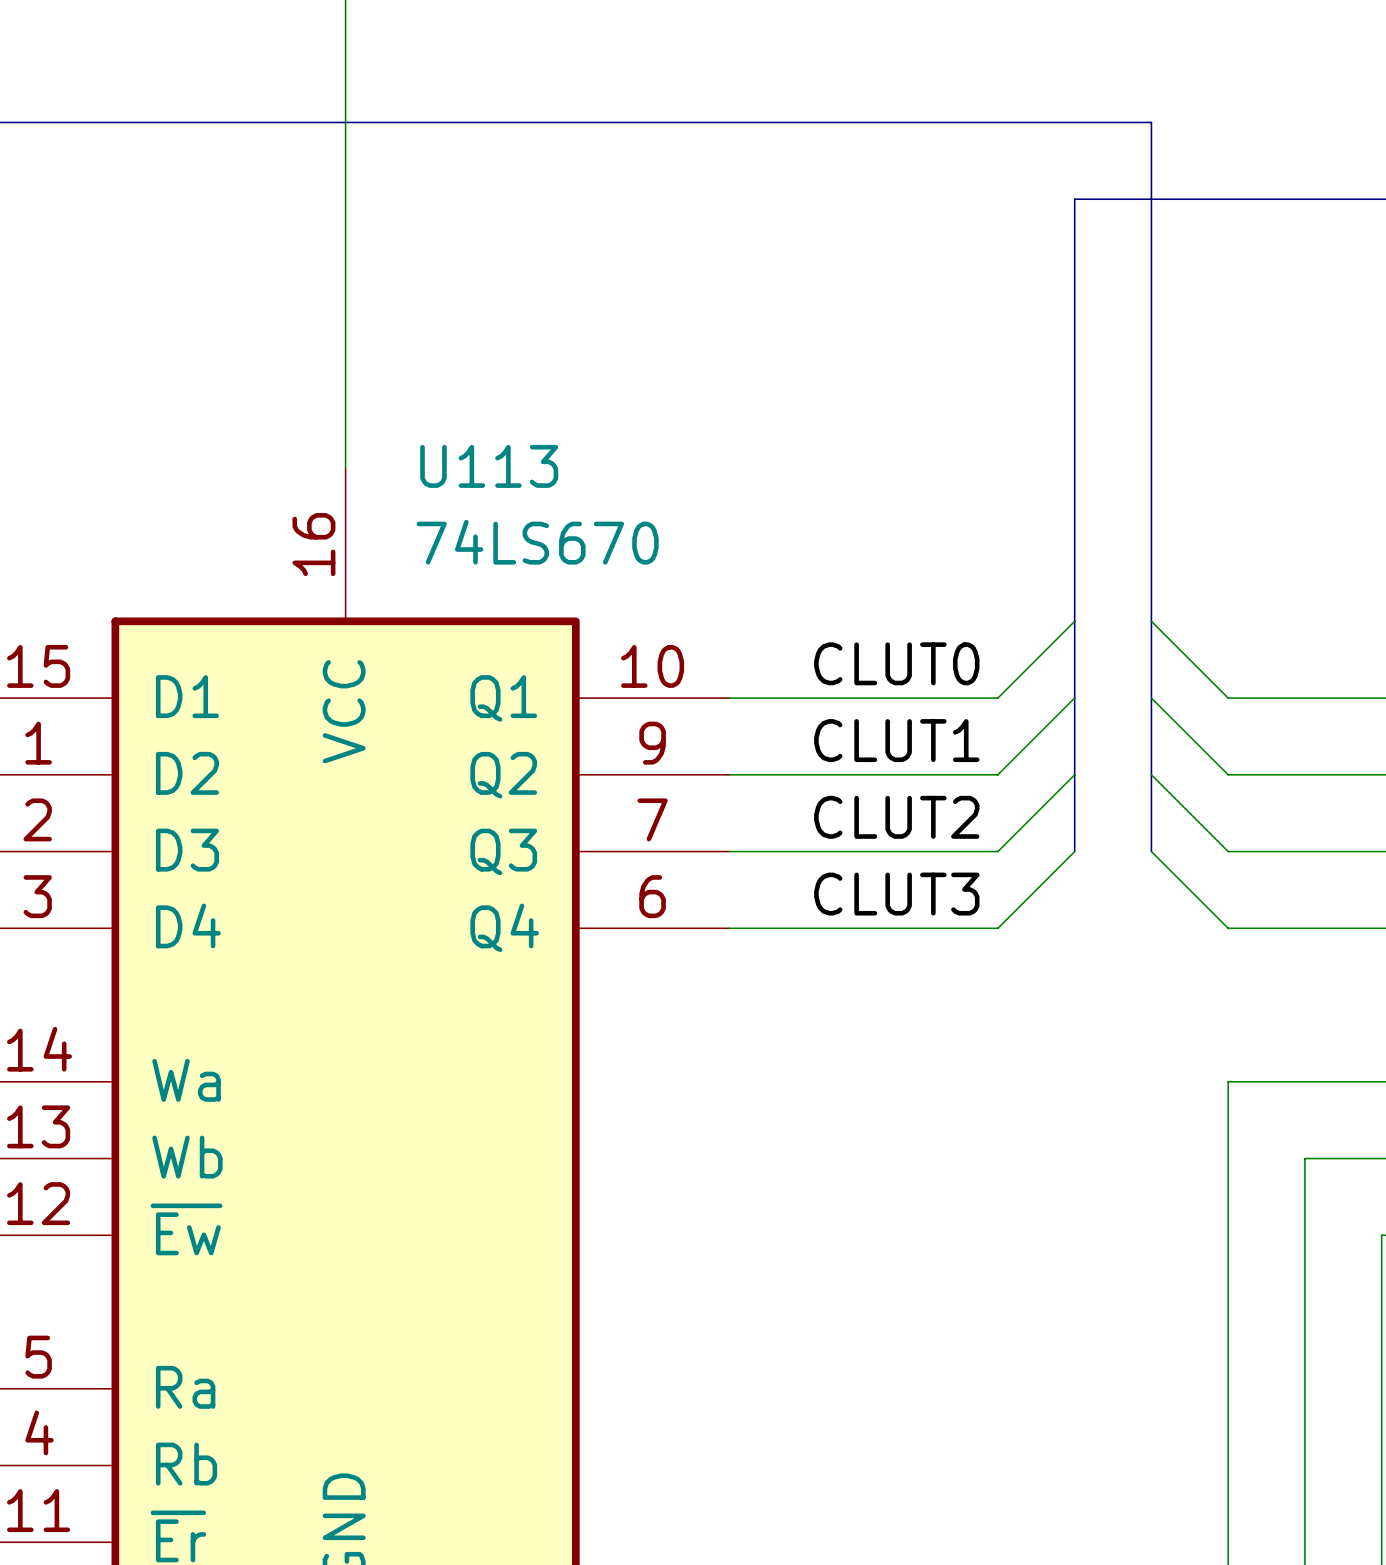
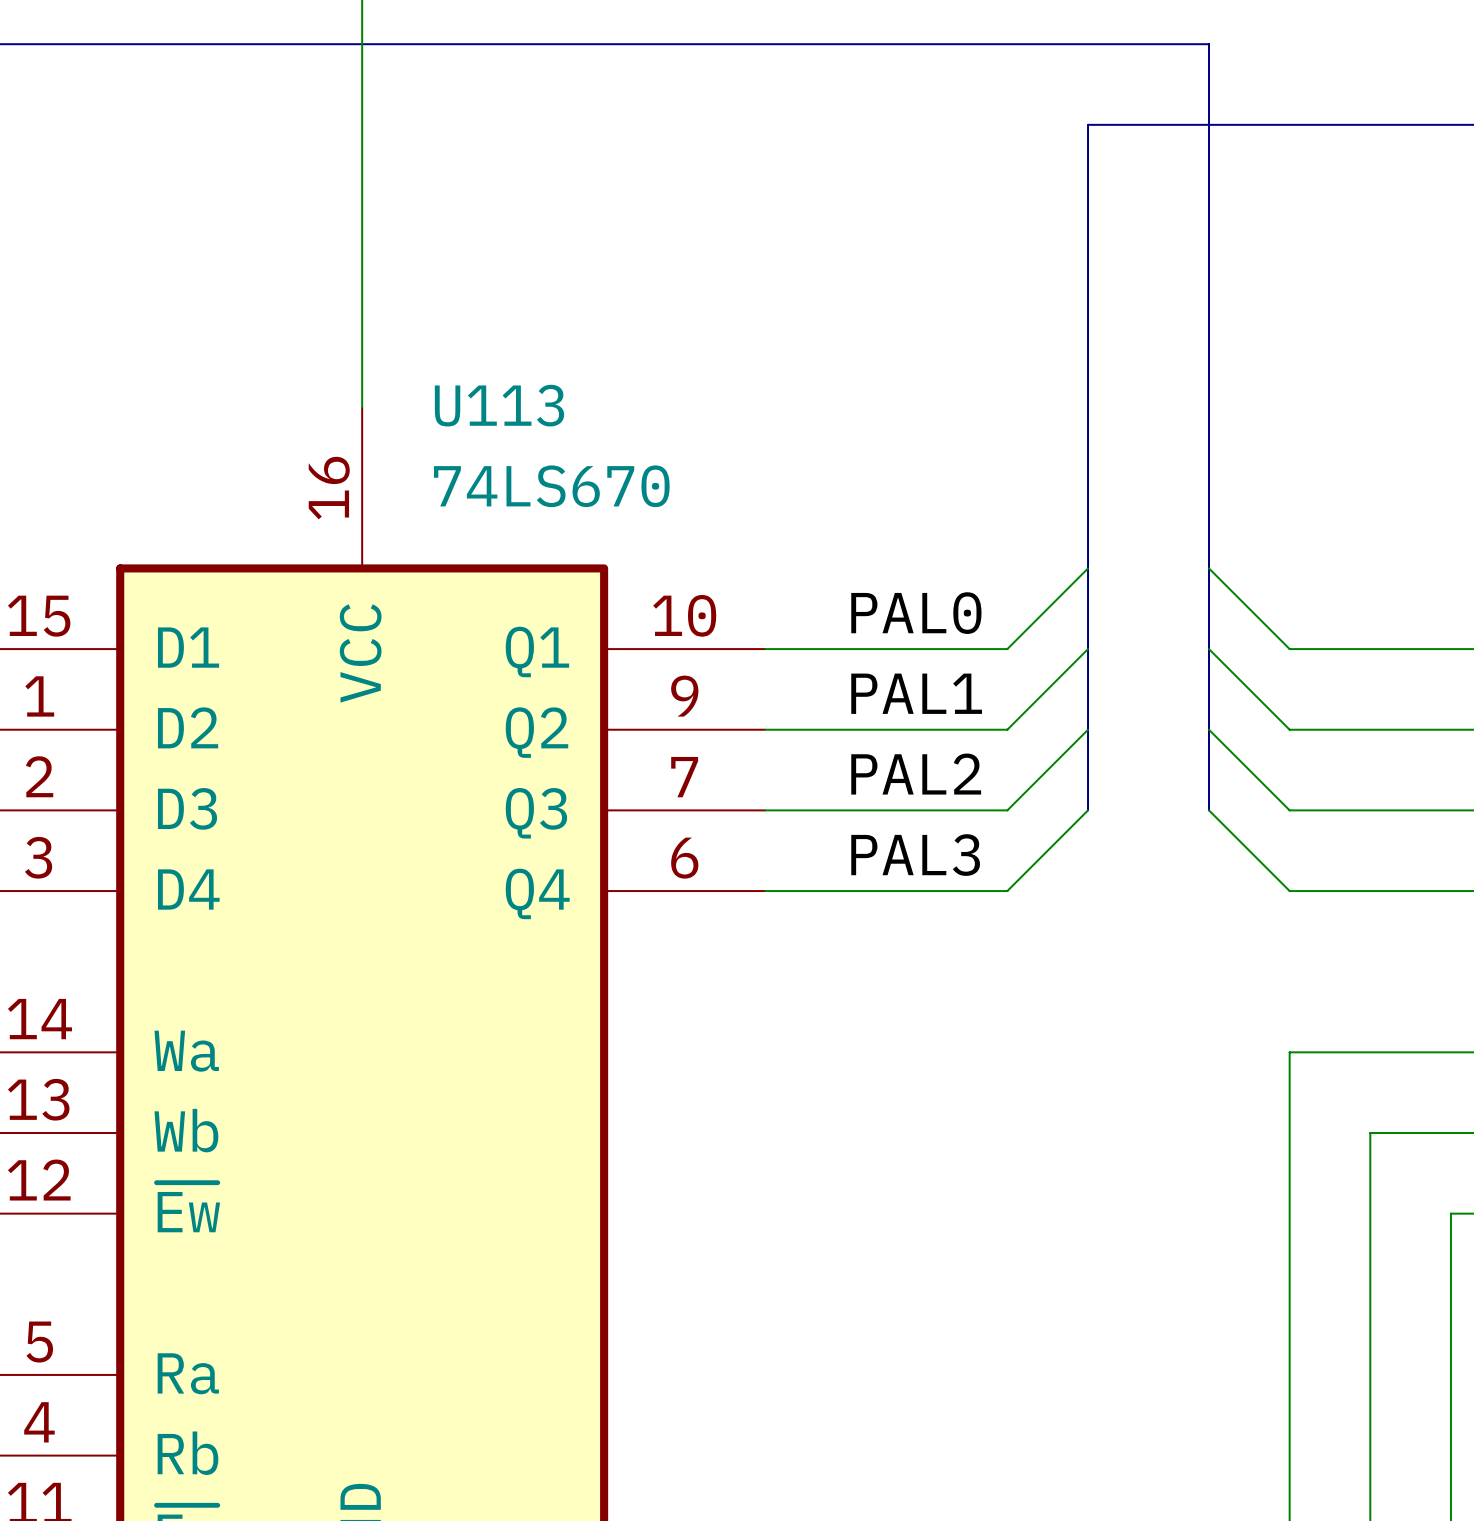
bus: (1074, 199) (1074, 851) -> (1128, 124) (1088, 124) (1088, 810)
wire: (1074, 621) (997, 698) (959, 698) -> (1088, 568) (1007, 649)
label: CLUT0 (896, 663) -> PAL0 (916, 613)
wire: (1074, 698) (997, 774) (959, 774) -> (1088, 649) (1007, 729)
label: CLUT1 (896, 740) -> PAL1 (916, 693)
wire: (1074, 774) (997, 851) (959, 851) -> (1088, 729) (1007, 810)
label: CLUT2 (896, 817) -> PAL2 (916, 774)
wire: (1074, 851) (997, 928) (959, 928) -> (1088, 810) (1007, 891)
label: CLUT3 (896, 894) -> PAL3 (915, 855)

